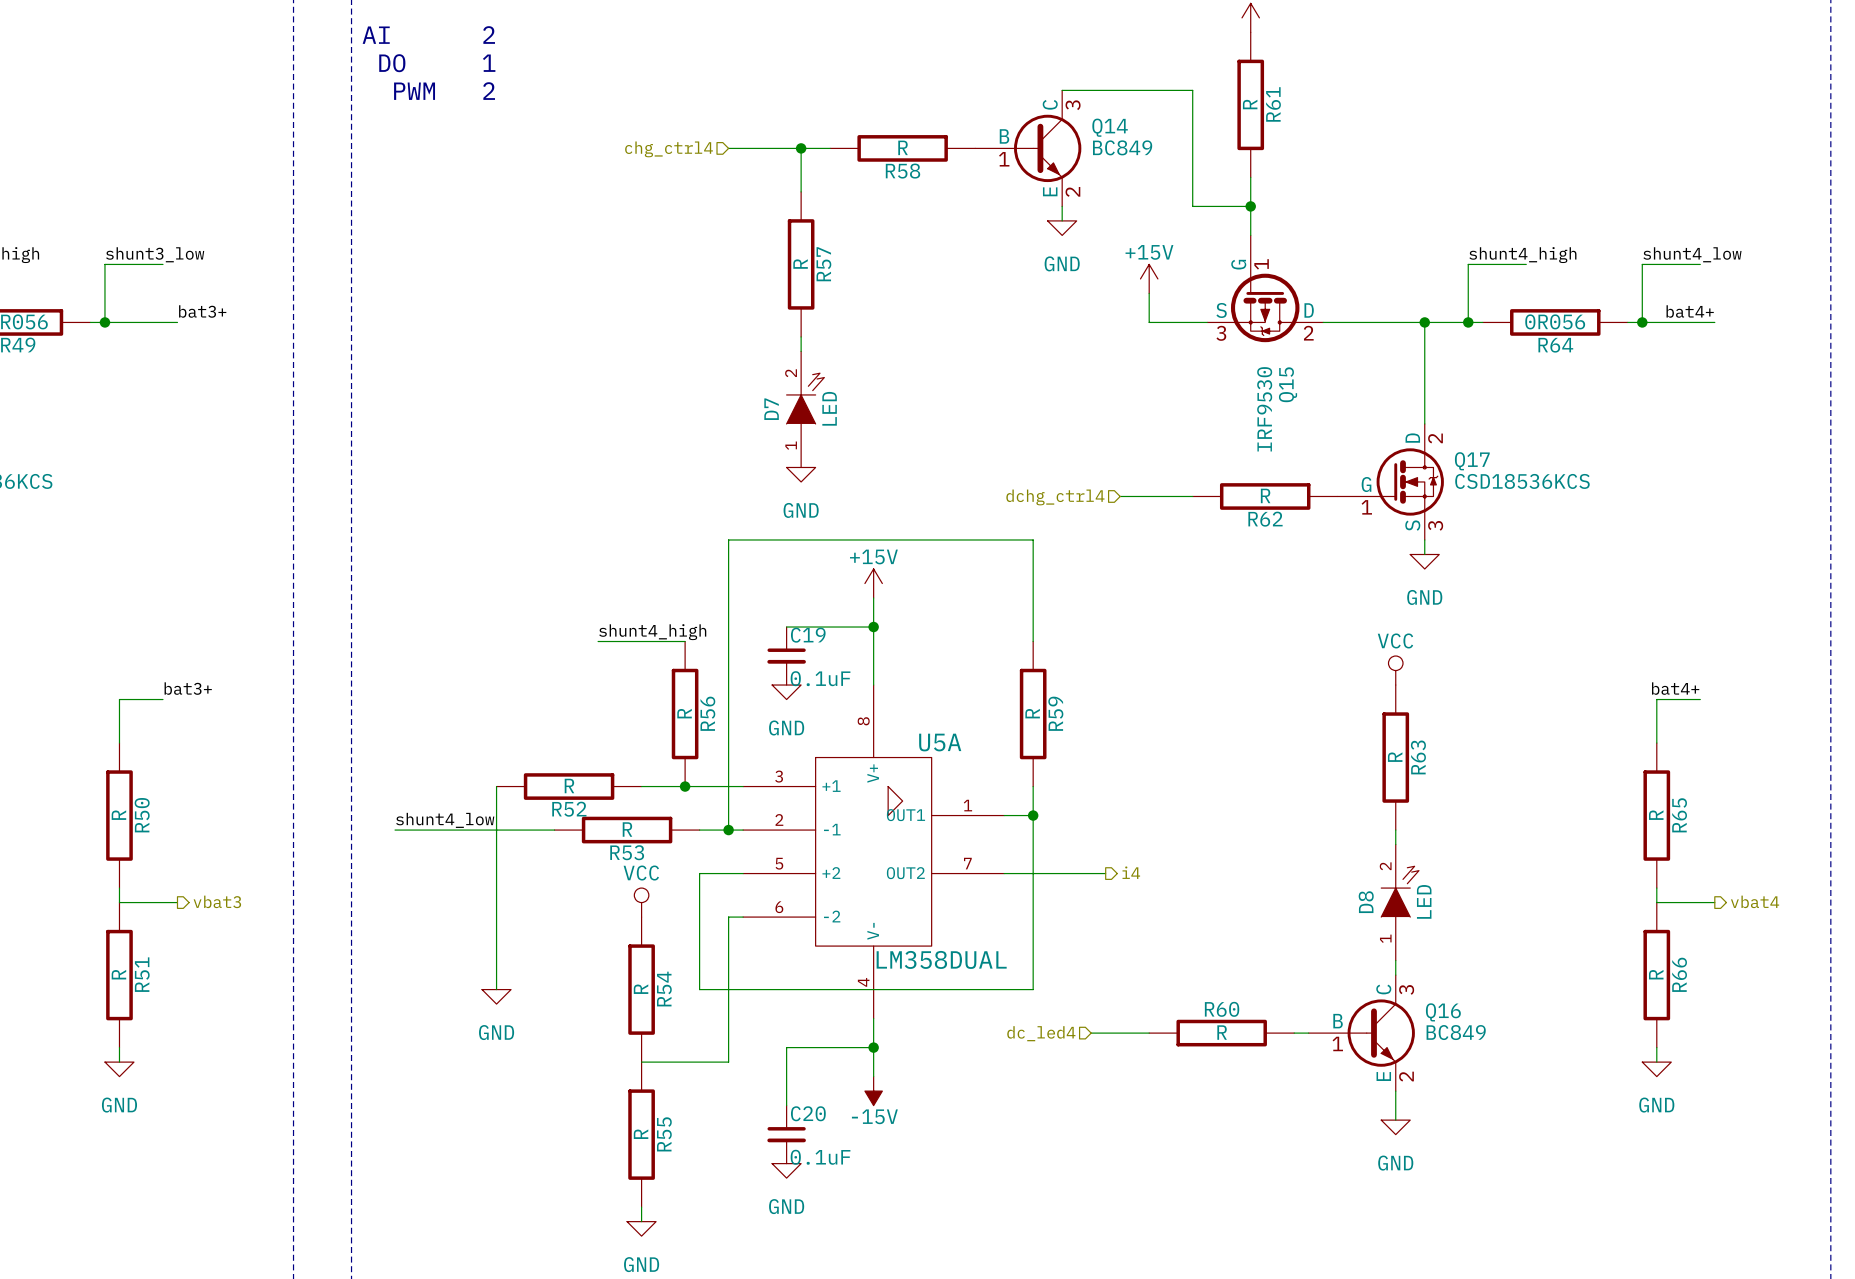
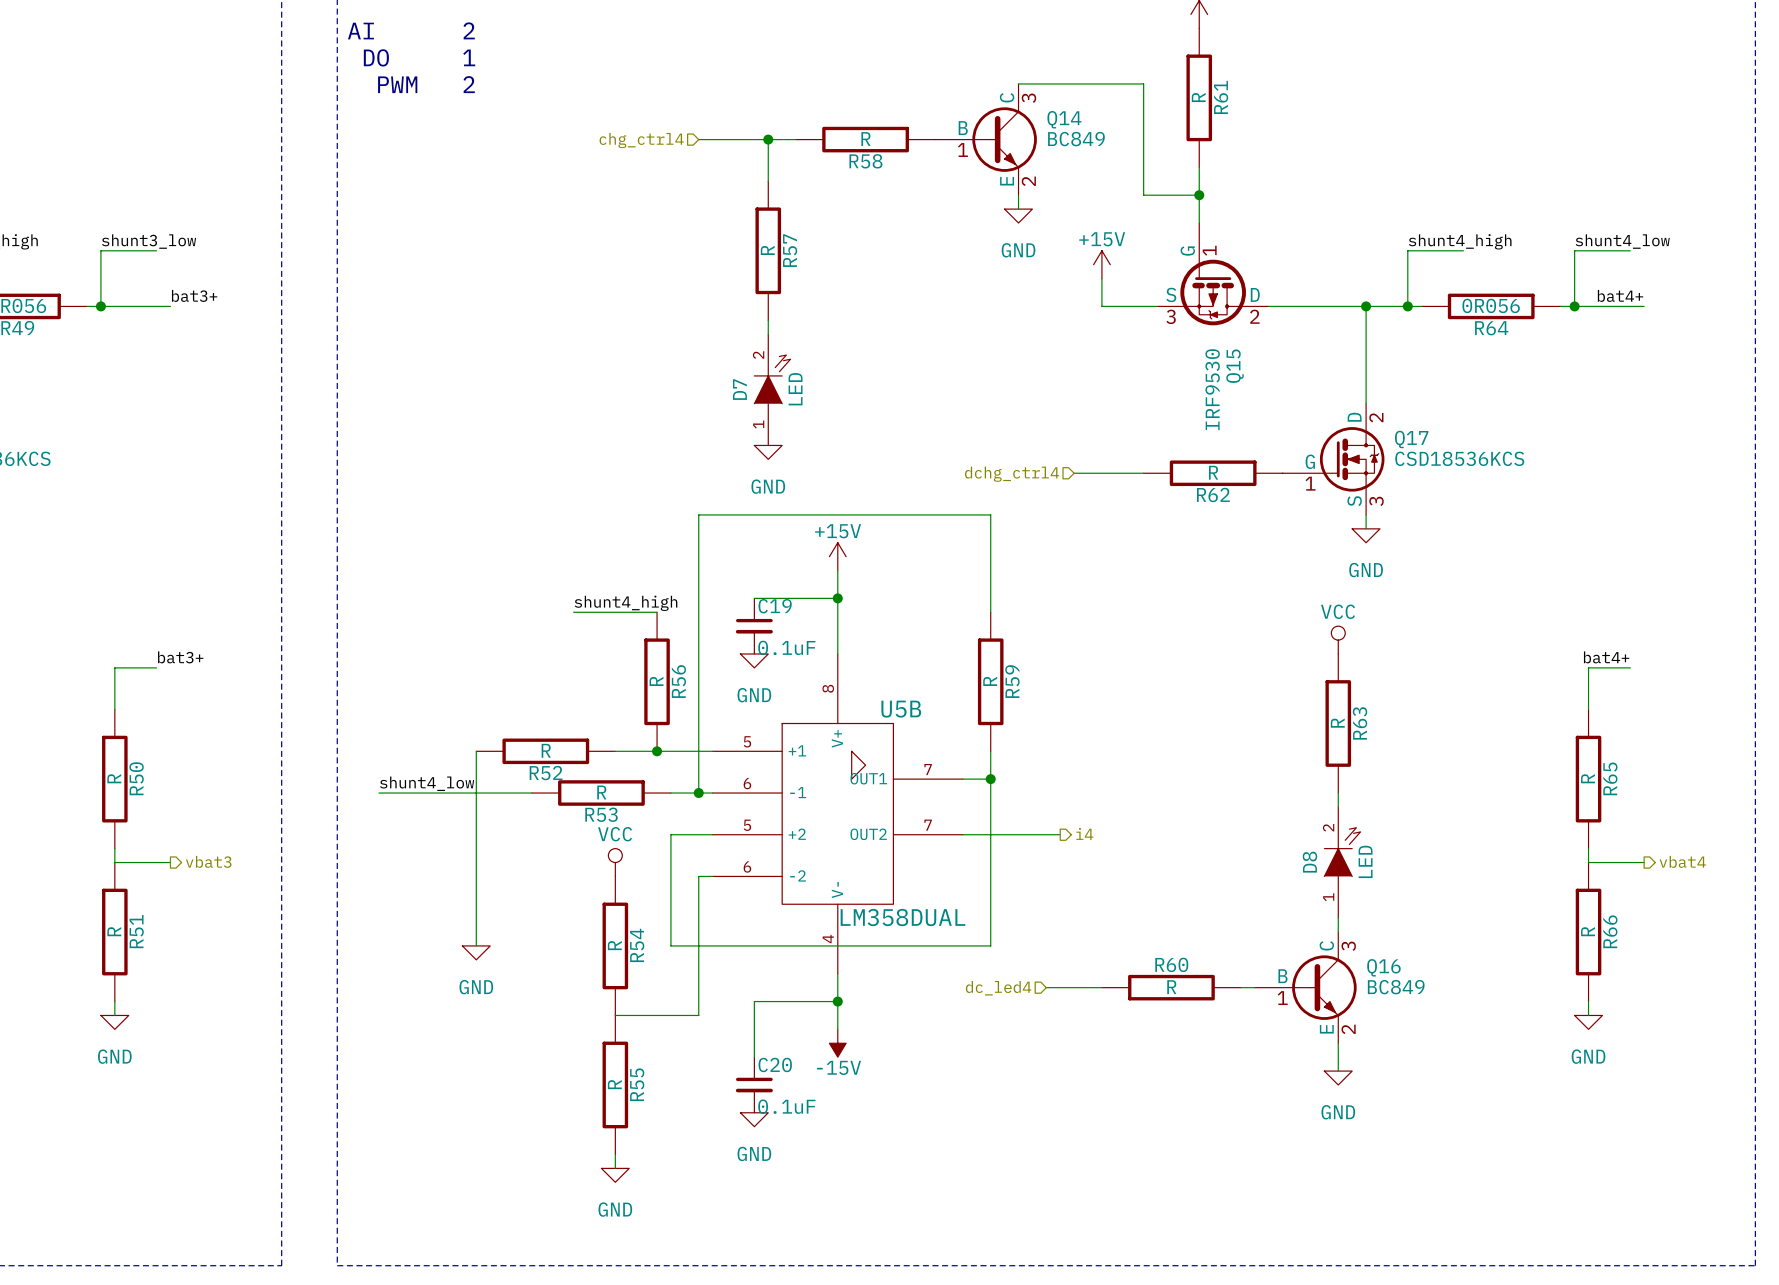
U5A name: U5A (940, 742) -> U5B (901, 709)
U5A pin number: 3 (779, 776) -> 5 (747, 741)
U5A pin number: 1 (967, 805) -> 7 (928, 769)
U5A pin number: 2 (779, 819) -> 6 (747, 783)

